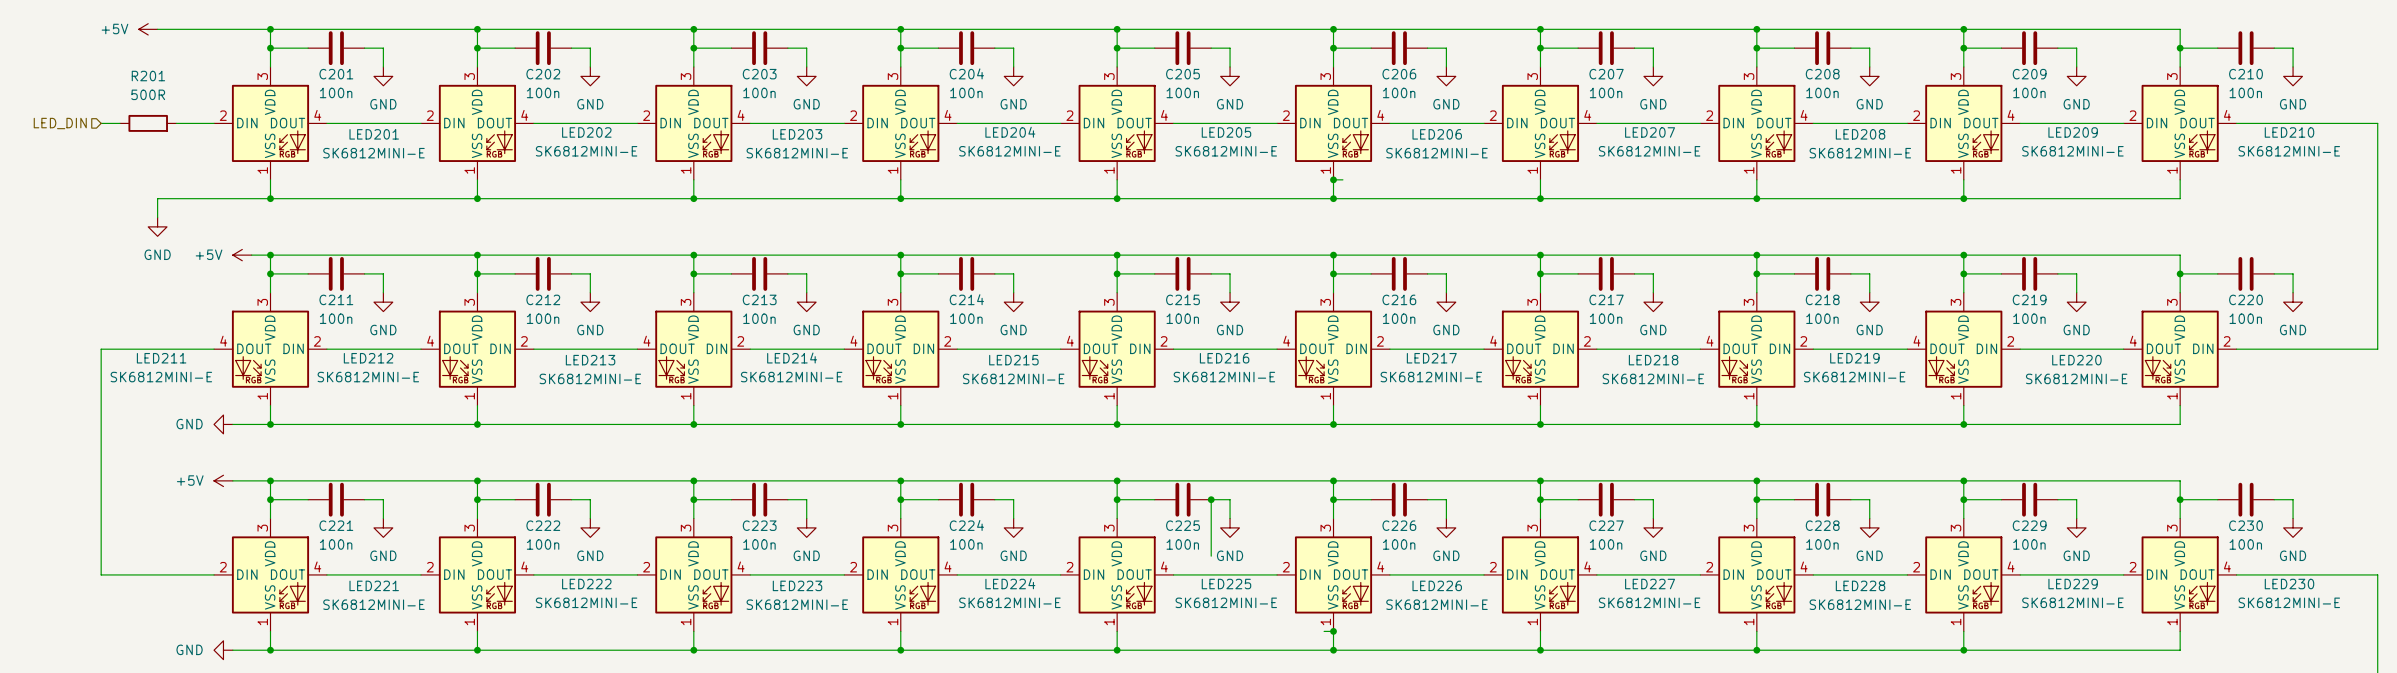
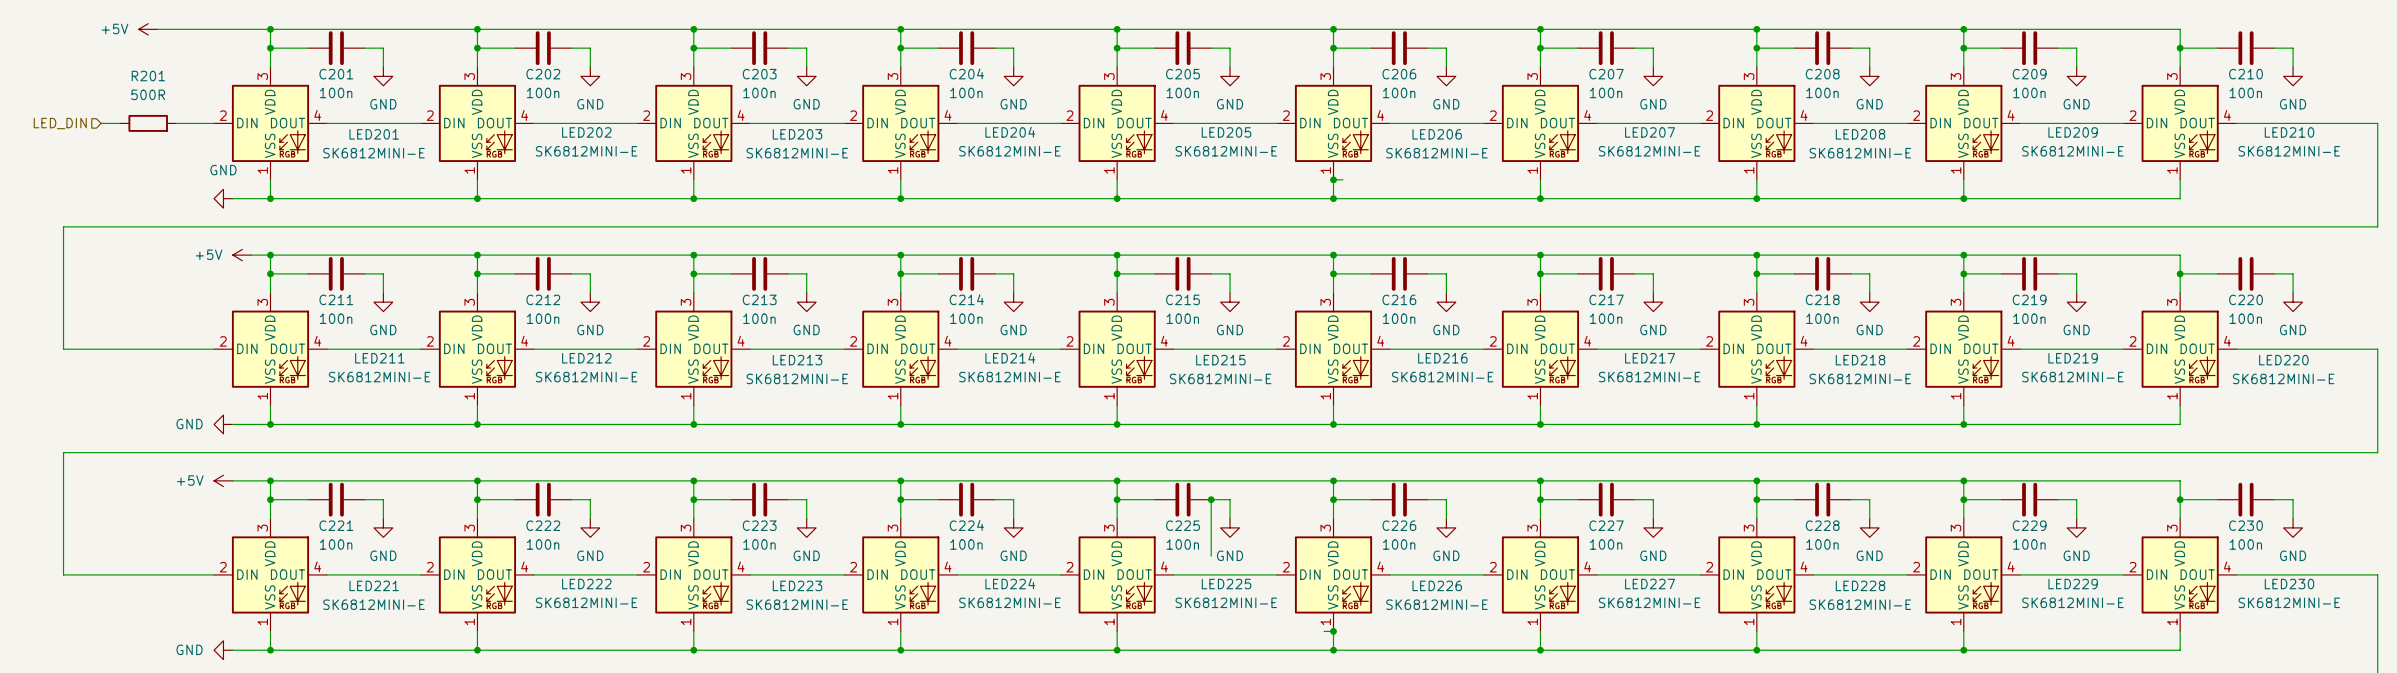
wire: (232, 198) (157, 198) (157, 217) -> none
power symbol rotation: 0° (157, 226) -> 90° clockwise (223, 198)
power symbol position: GND (157, 226) -> GND (223, 198)
wire: (2377, 226) (2377, 349) -> (2377, 226) (63, 226) (63, 349) (101, 349)
power symbol text position: GND (157, 254) -> GND (223, 170)
wire: (101, 349) (101, 574) -> (2377, 349) (2377, 452) (63, 452) (63, 574) (101, 574)
LED211 flip: as is (270, 349) -> left-right (270, 349)
LED212 flip: as is (477, 349) -> left-right (477, 349)
LED213 flip: as is (693, 349) -> left-right (693, 349)
LED214 flip: as is (900, 349) -> left-right (900, 349)
LED215 flip: as is (1117, 349) -> left-right (1117, 349)
LED216 flip: as is (1333, 349) -> left-right (1333, 349)
LED217 flip: as is (1540, 349) -> left-right (1540, 349)
LED218 flip: as is (1756, 349) -> left-right (1756, 349)
LED219 flip: as is (1963, 349) -> left-right (1963, 349)
LED220 flip: as is (2180, 349) -> left-right (2180, 349)

